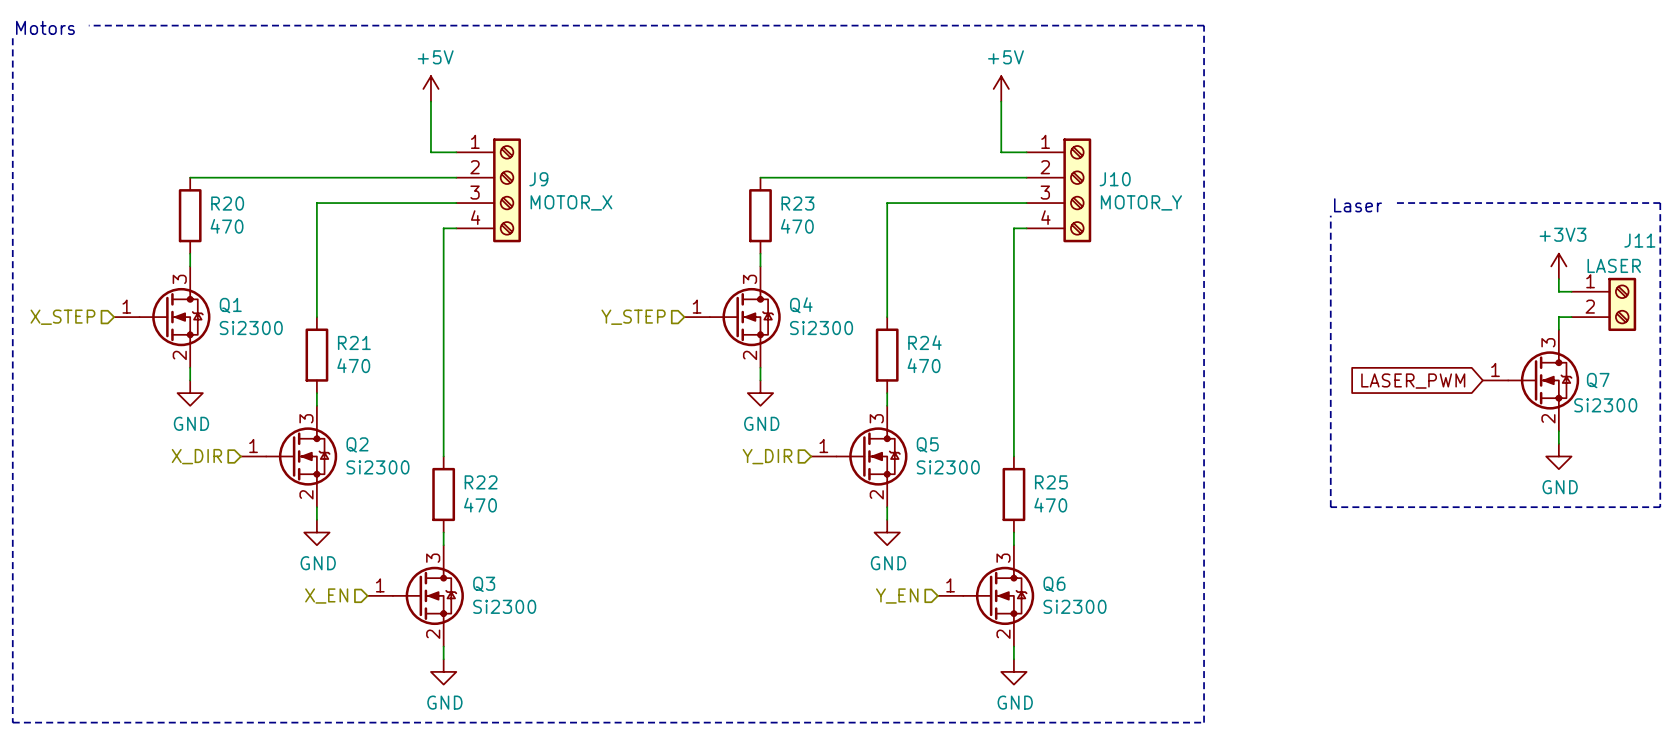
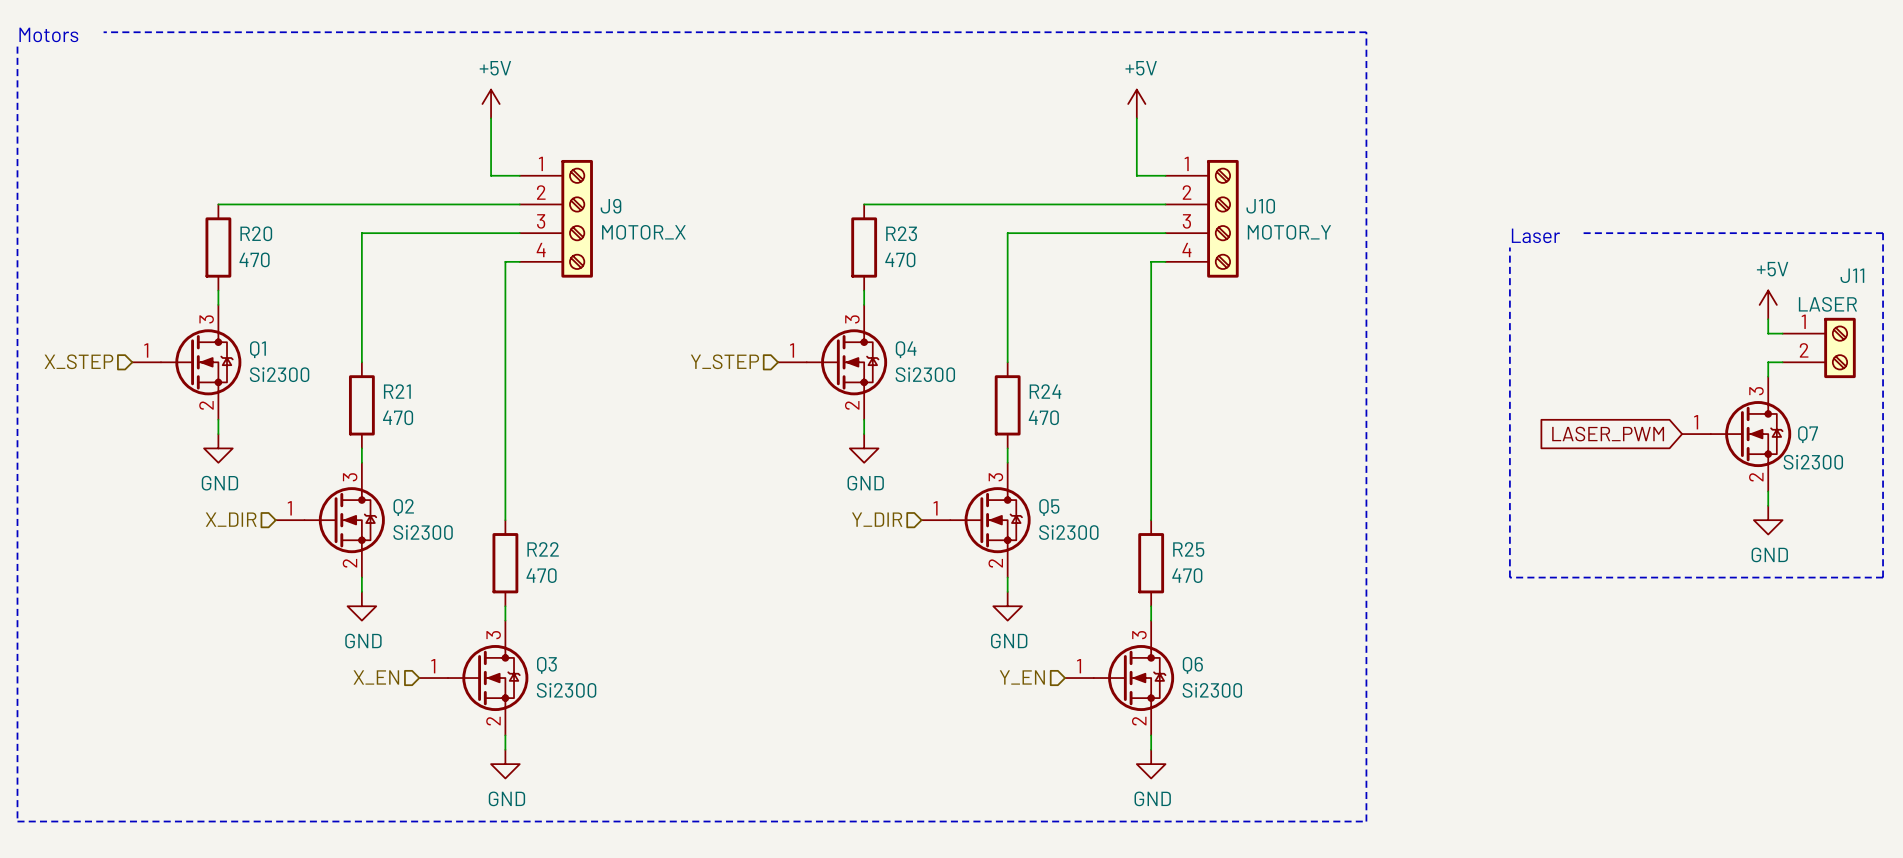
power symbol: +3V3 (1558, 266) -> +5V (1768, 304)

